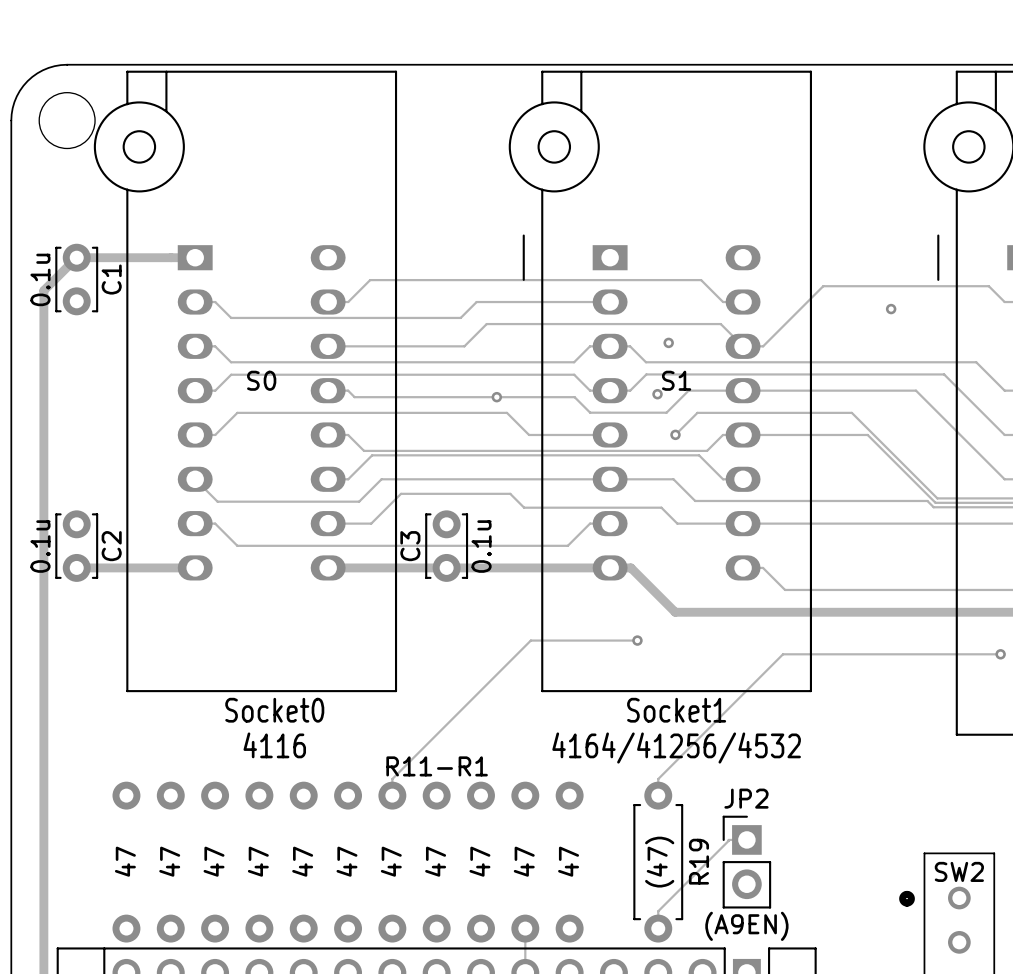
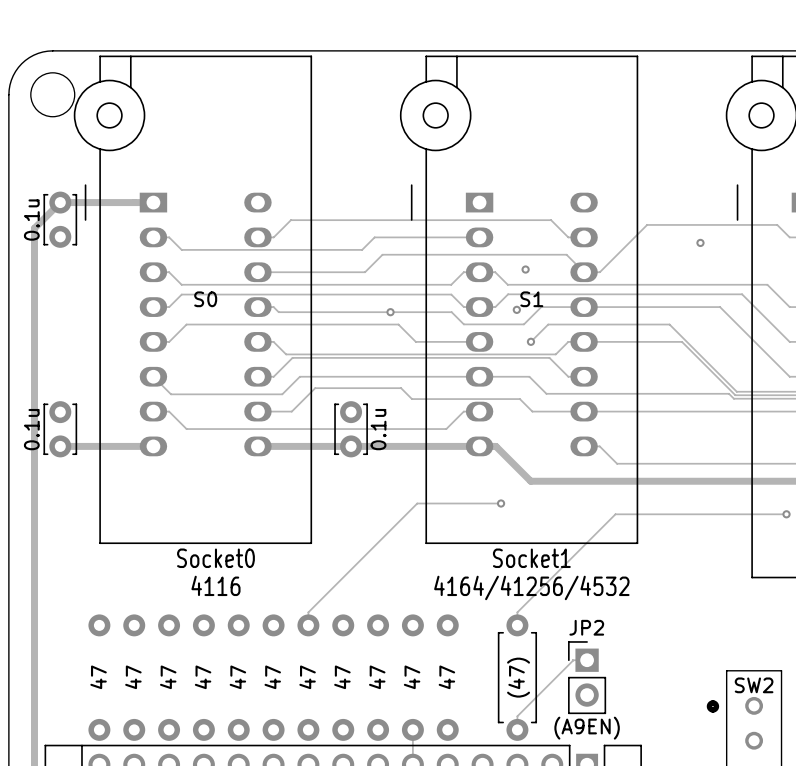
S0 footprint: [93, 70, 398, 693] -> [73, 55, 313, 545]
C1 name: C1 (111, 279) -> none
C2 name: C2 (111, 546) -> none
C3 name: C3 (410, 546) -> none
text: R11-R1 (437, 766) -> none
R19 name: R19 (698, 861) -> none

